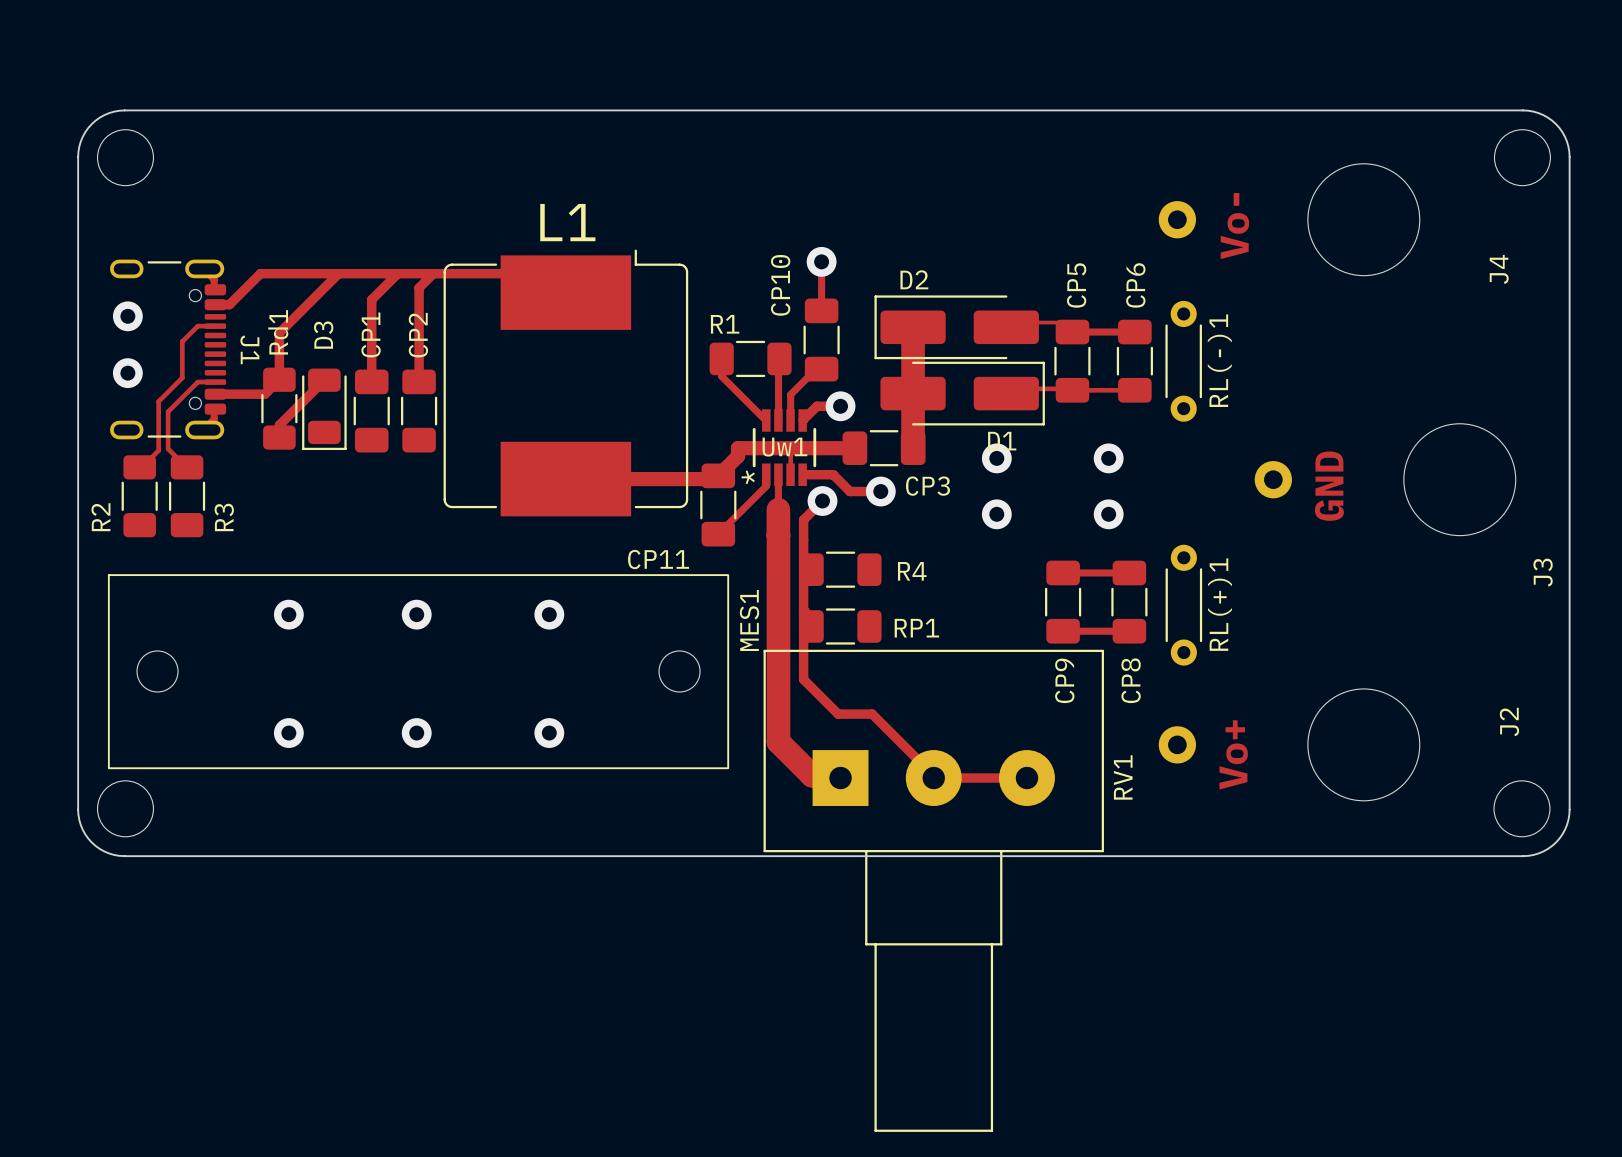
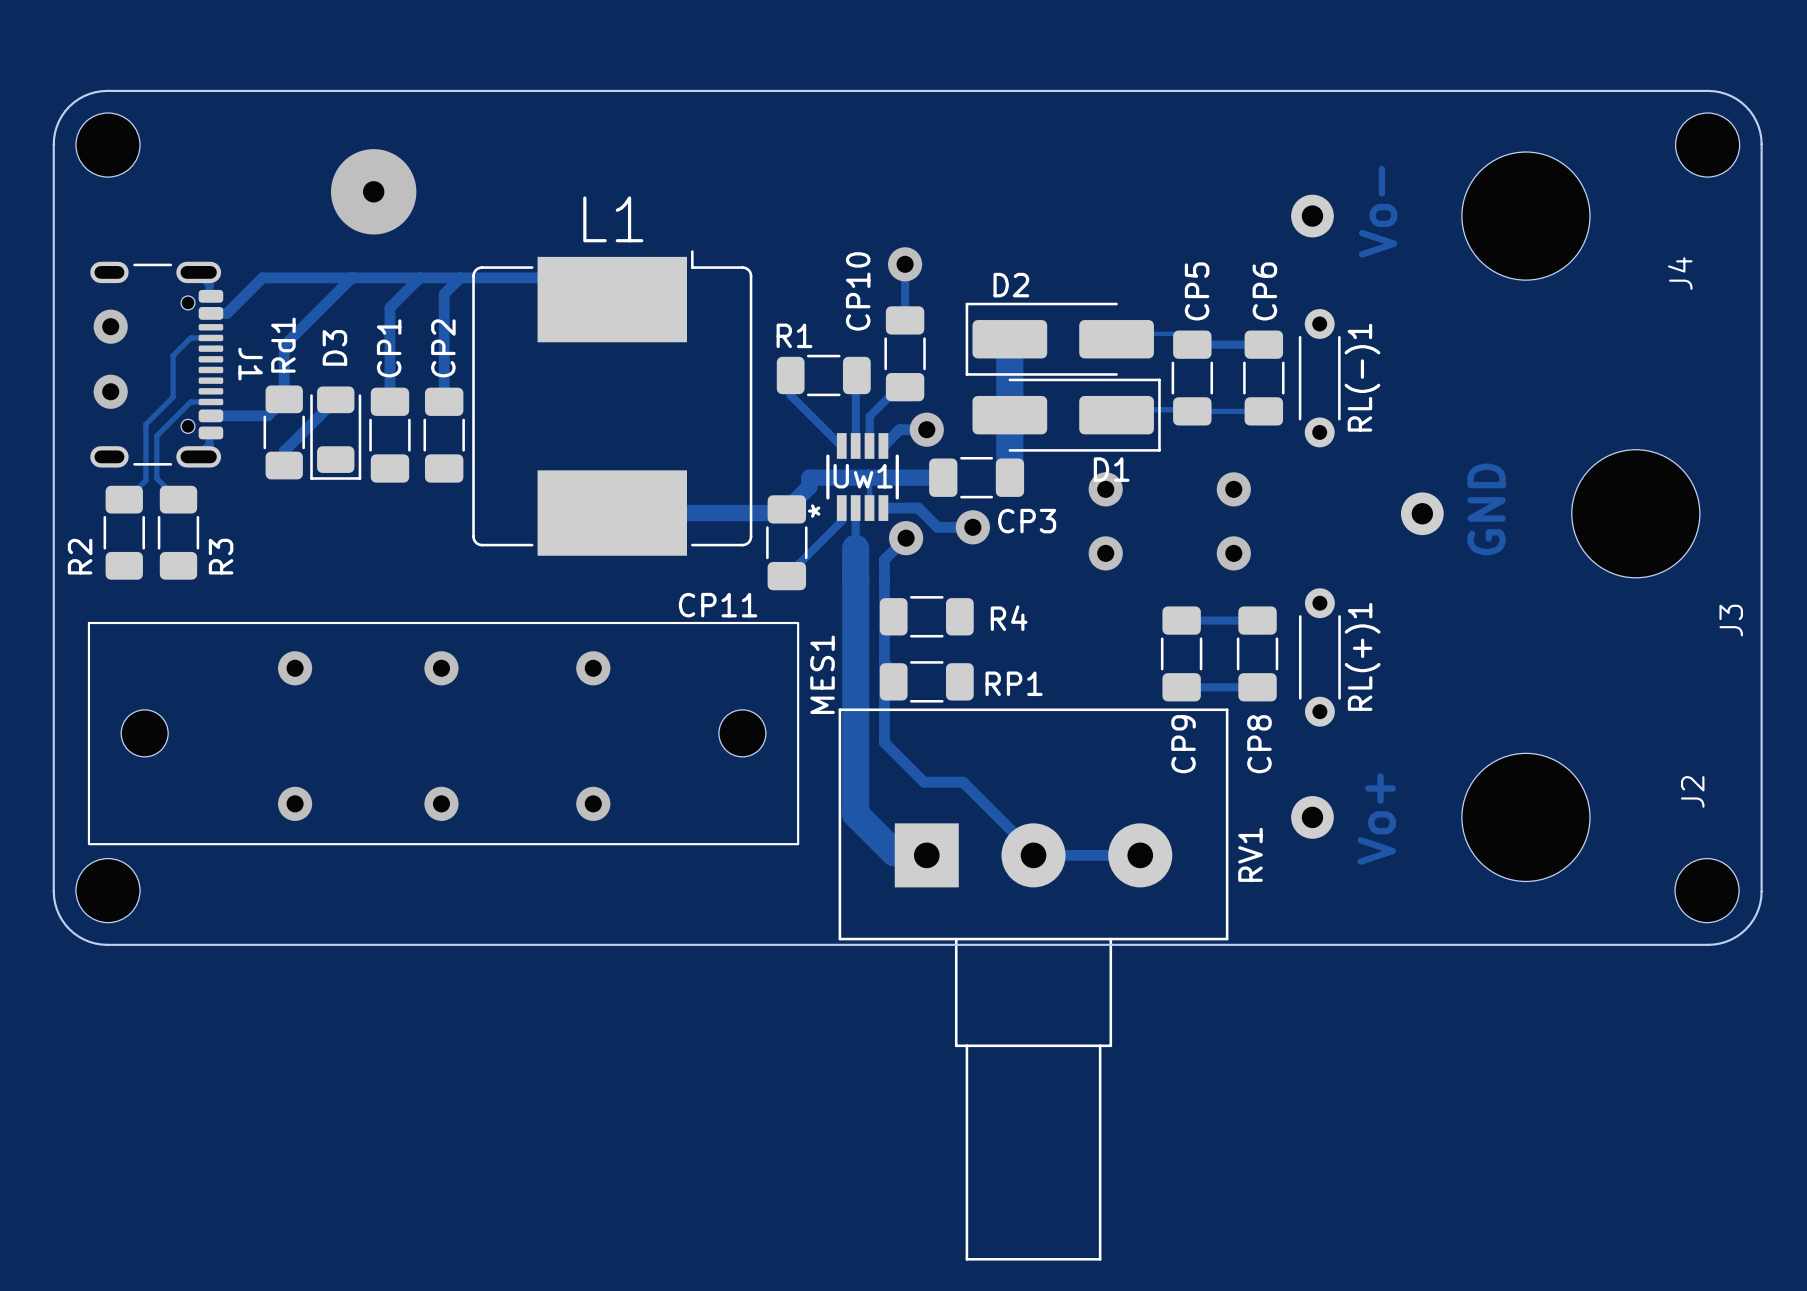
via: none -> (373, 191)

